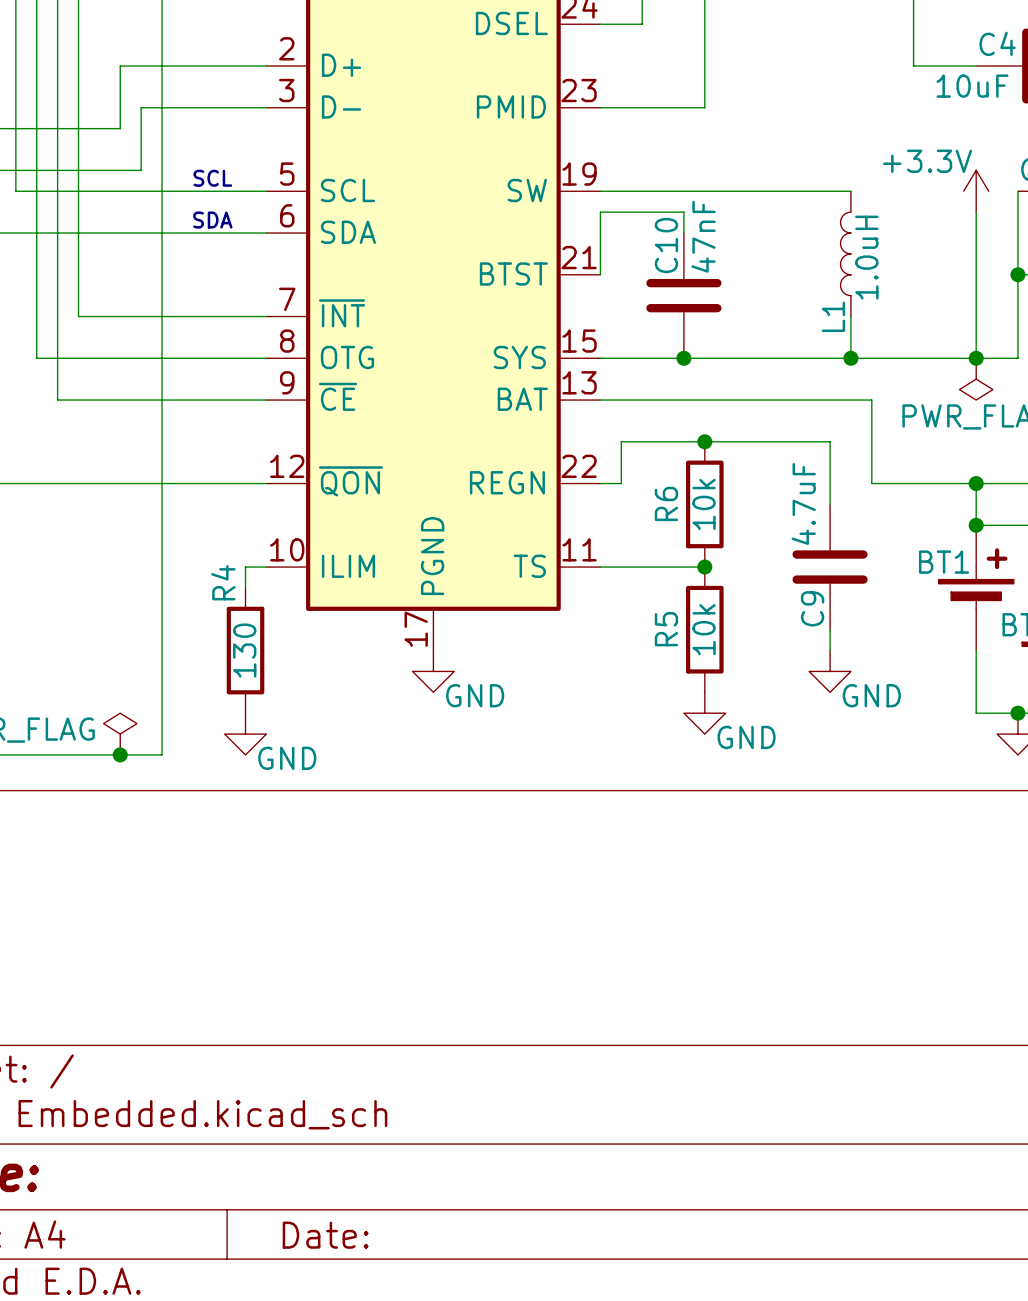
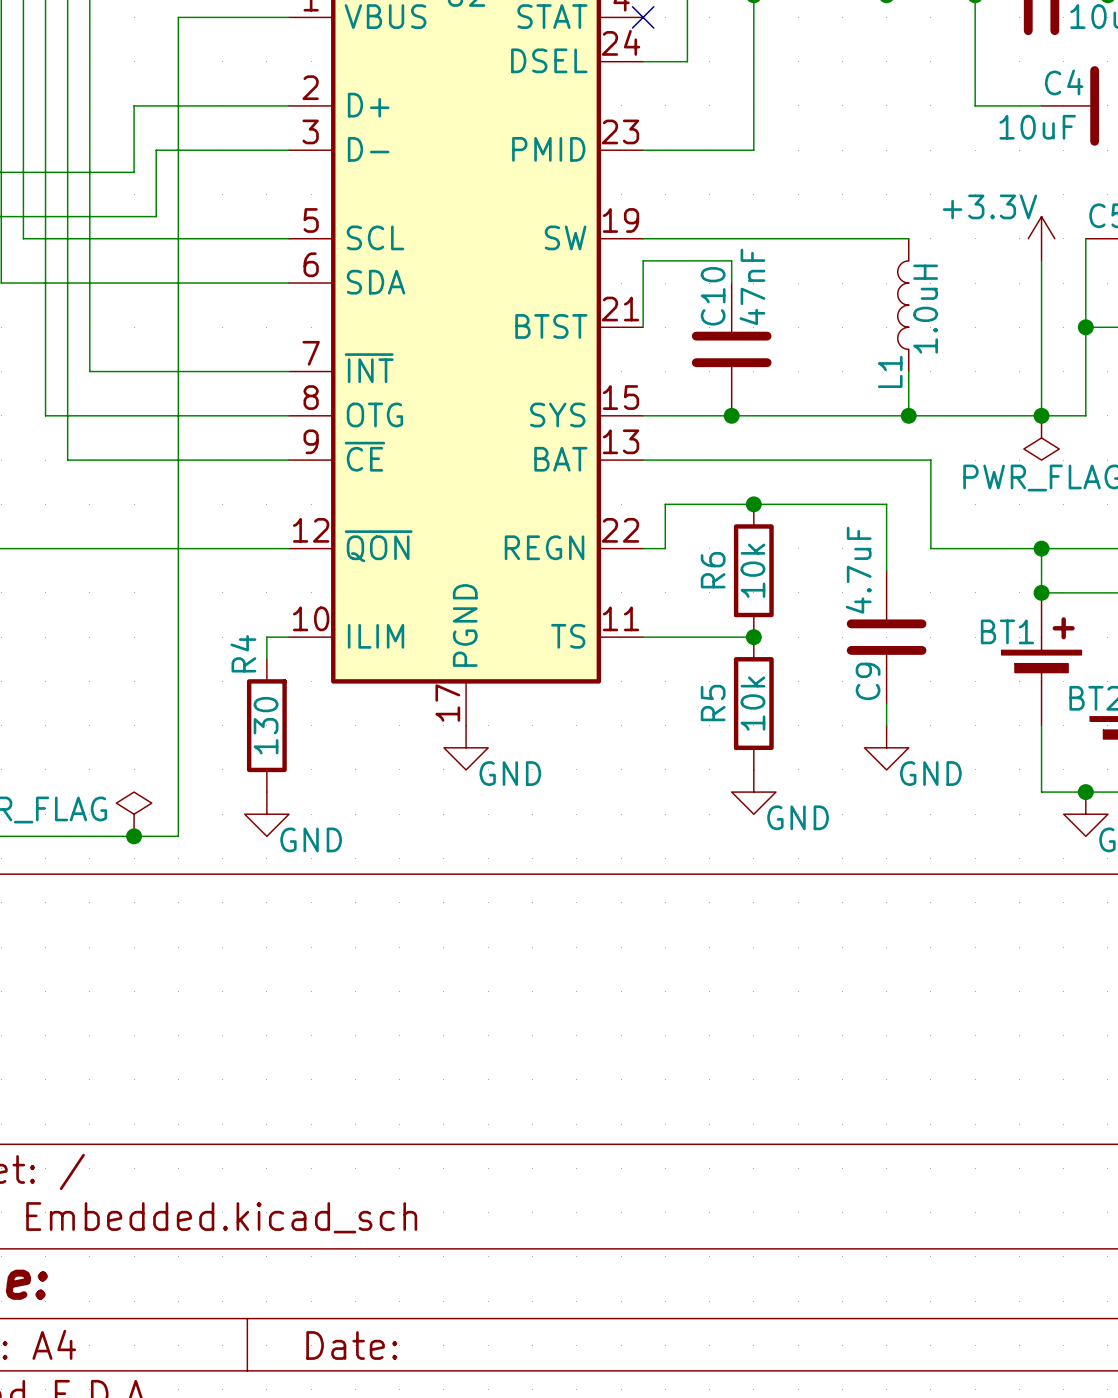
text: SCL (212, 178) -> none
text: SDA (212, 220) -> none

